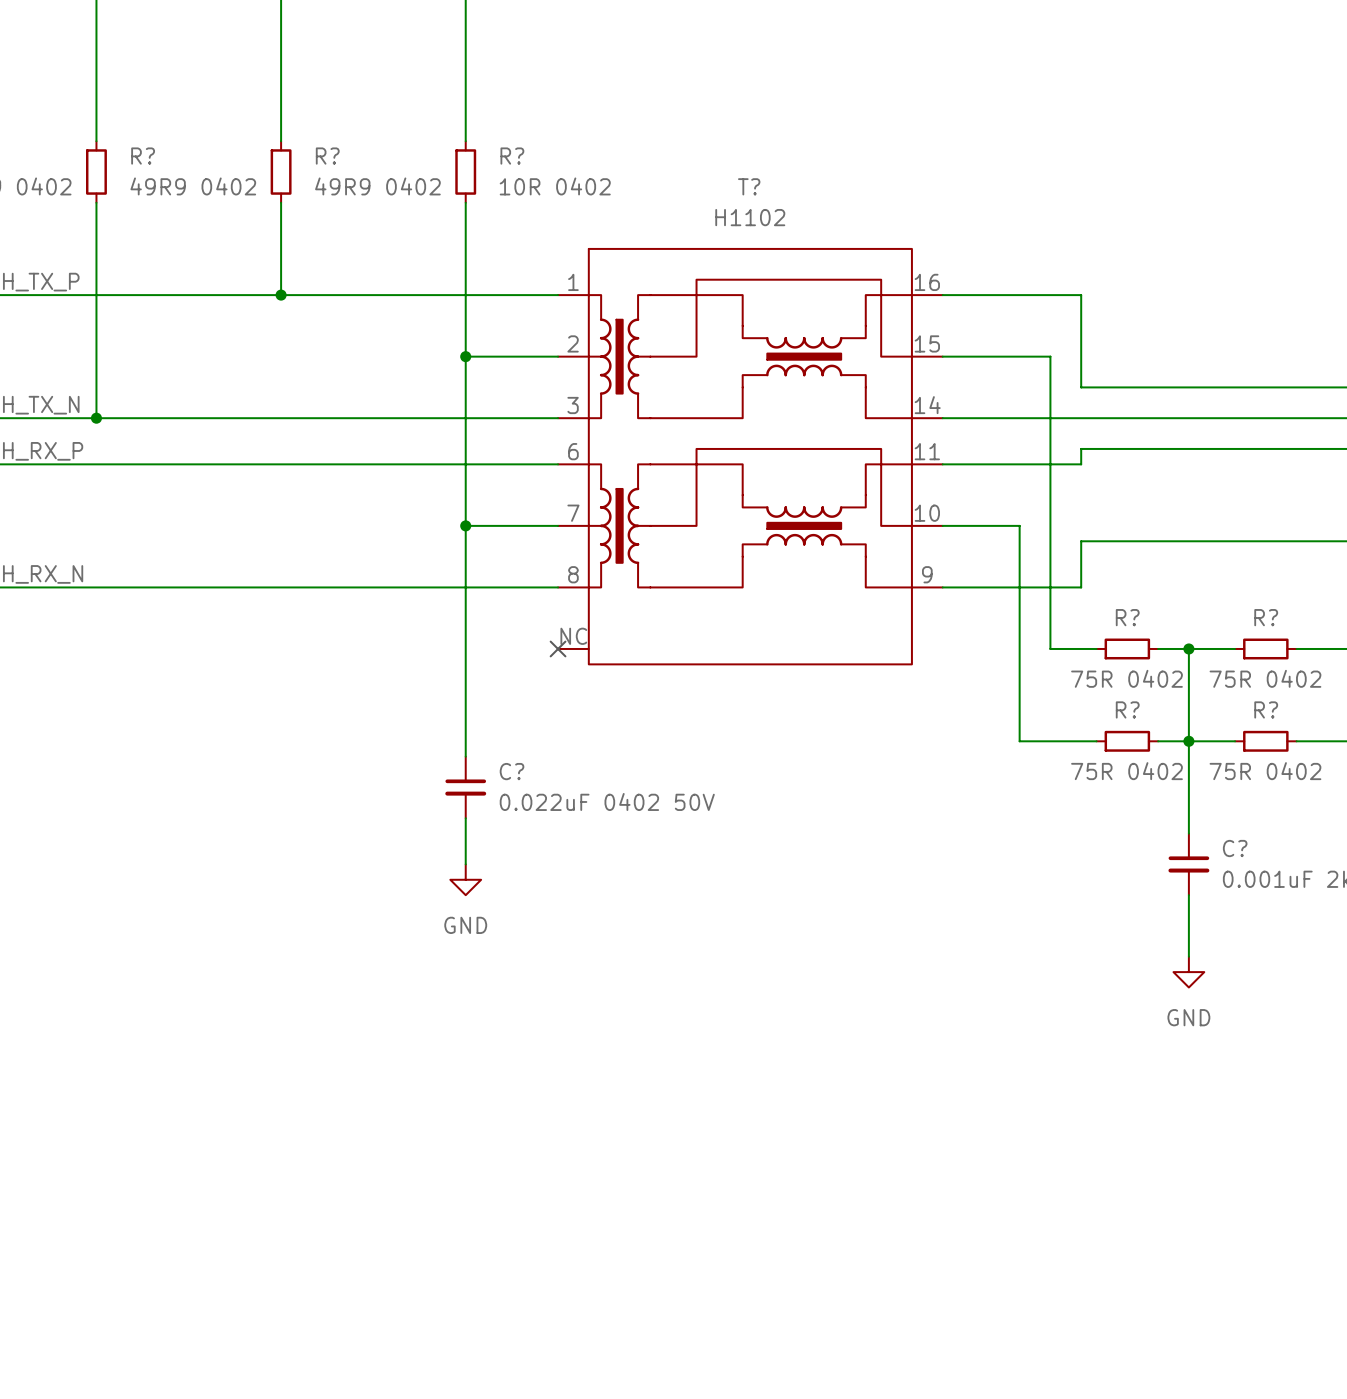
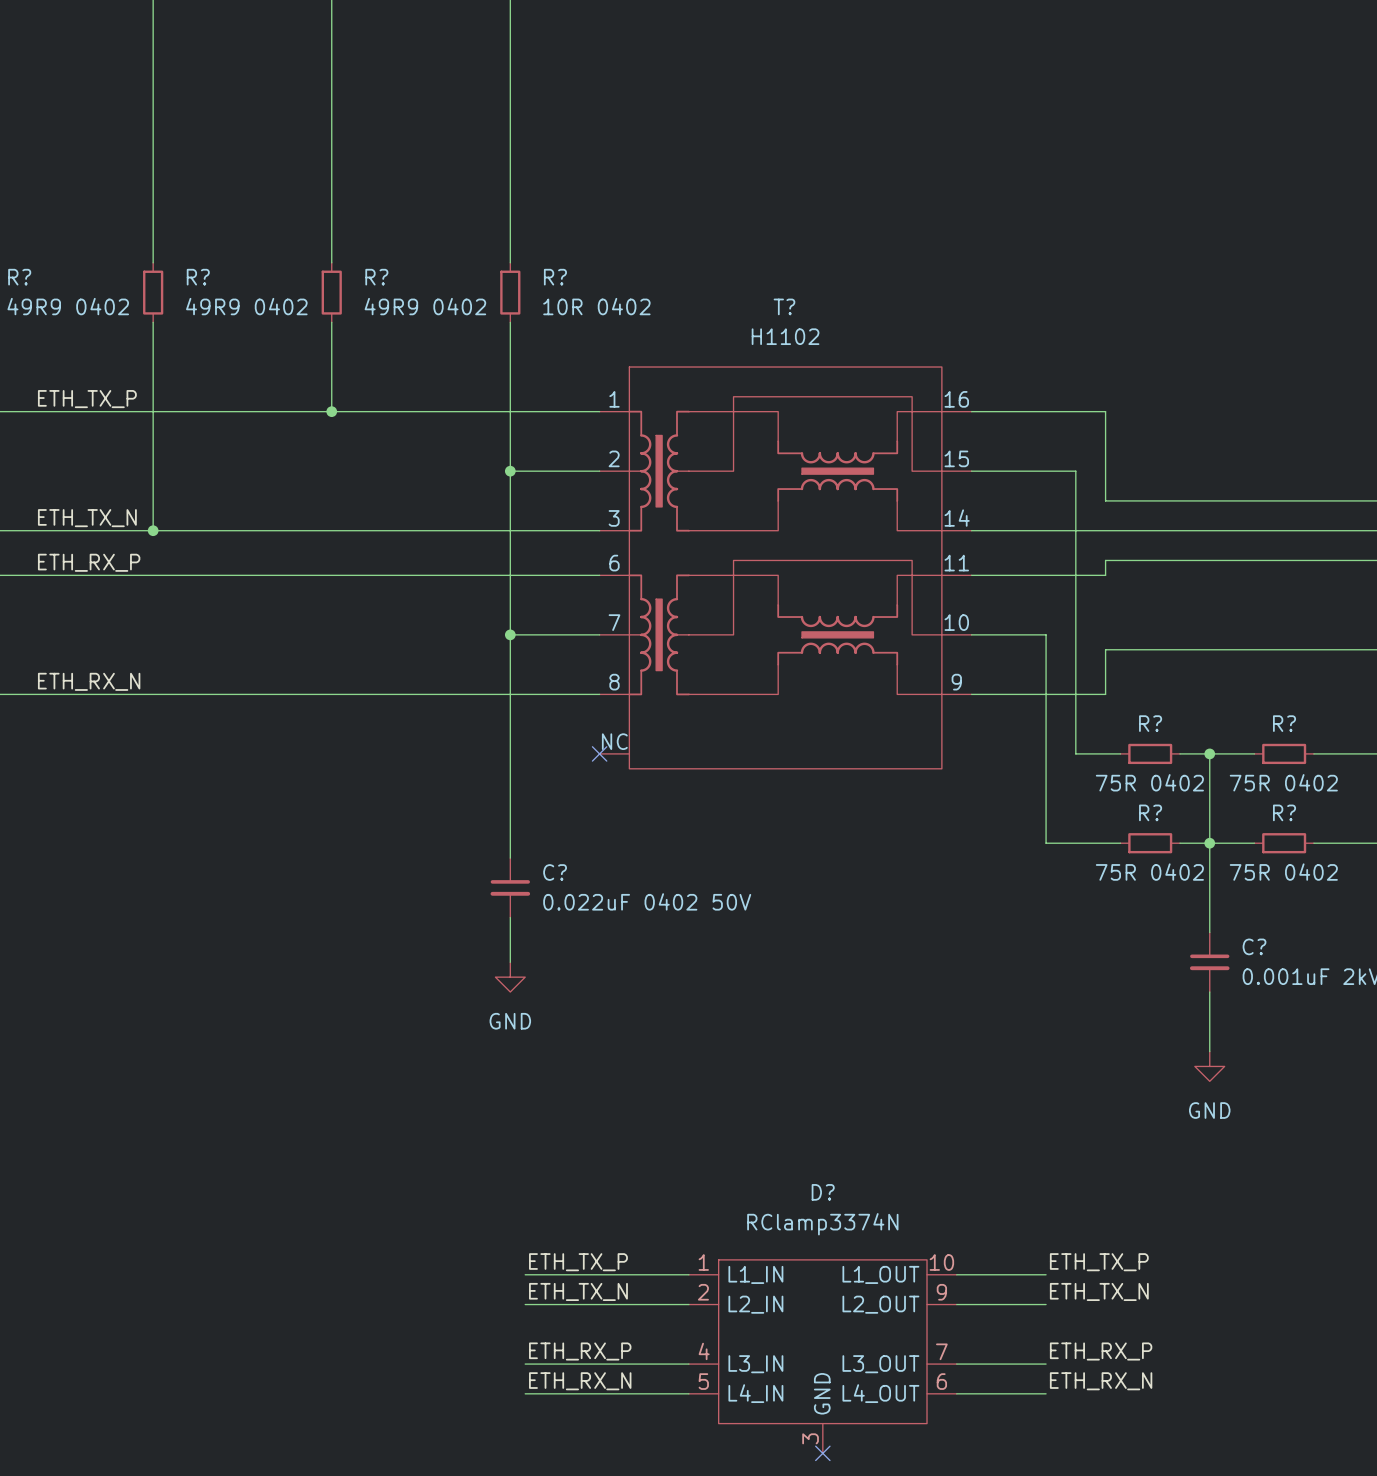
label: none -> ETH_TX_P (578, 1262)
label: none -> ETH_TX_P (1099, 1262)
wire: none -> (525, 1274) (688, 1274)
wire: none -> (956, 1274) (1046, 1274)
label: none -> ETH_TX_N (578, 1291)
label: none -> ETH_TX_N (1099, 1291)
wire: none -> (525, 1304) (688, 1304)
wire: none -> (956, 1304) (1046, 1304)
label: none -> ETH_RX_P (580, 1351)
label: none -> ETH_RX_P (1101, 1351)
D?: none -> RClamp3374N (822, 1356)
wire: none -> (525, 1364) (688, 1364)
wire: none -> (956, 1364) (1046, 1364)
label: none -> ETH_RX_N (580, 1381)
label: none -> ETH_RX_N (1101, 1381)
wire: none -> (525, 1393) (688, 1393)
wire: none -> (956, 1393) (1046, 1393)
no-connect mark: none -> (822, 1453)

